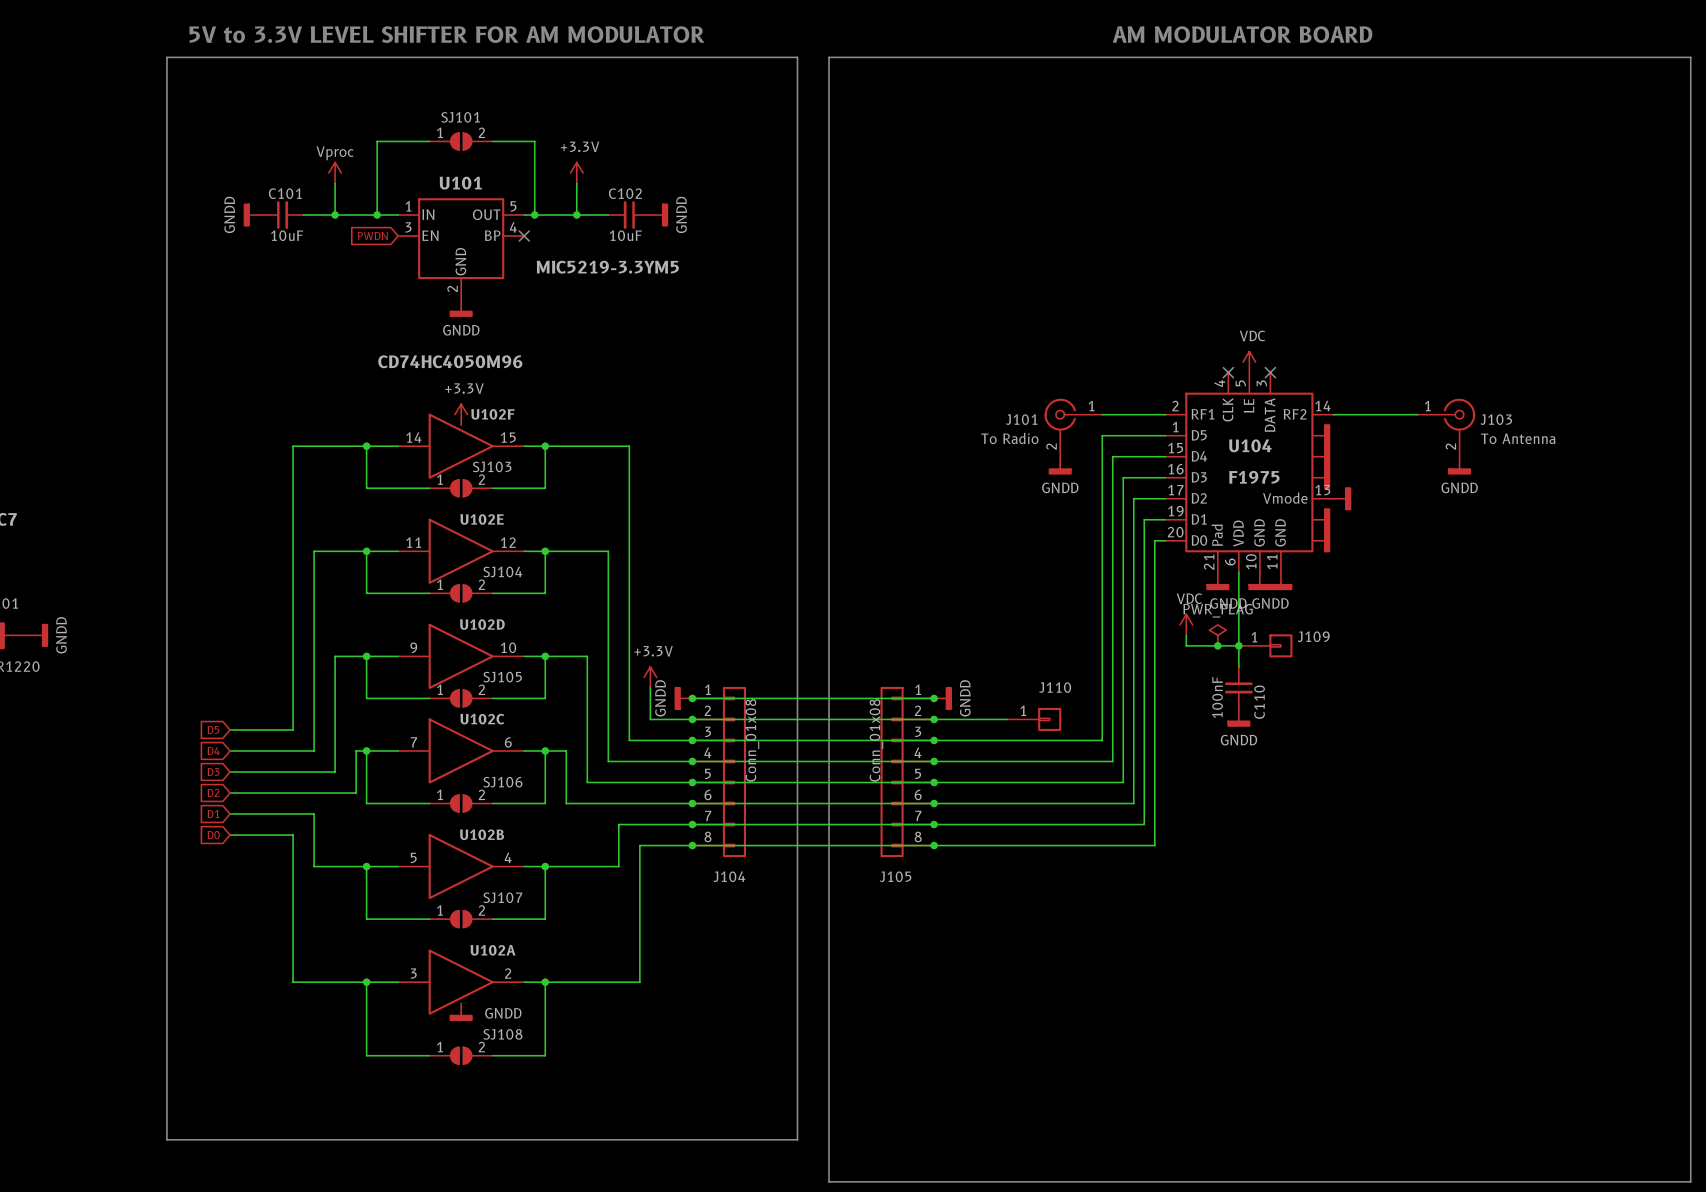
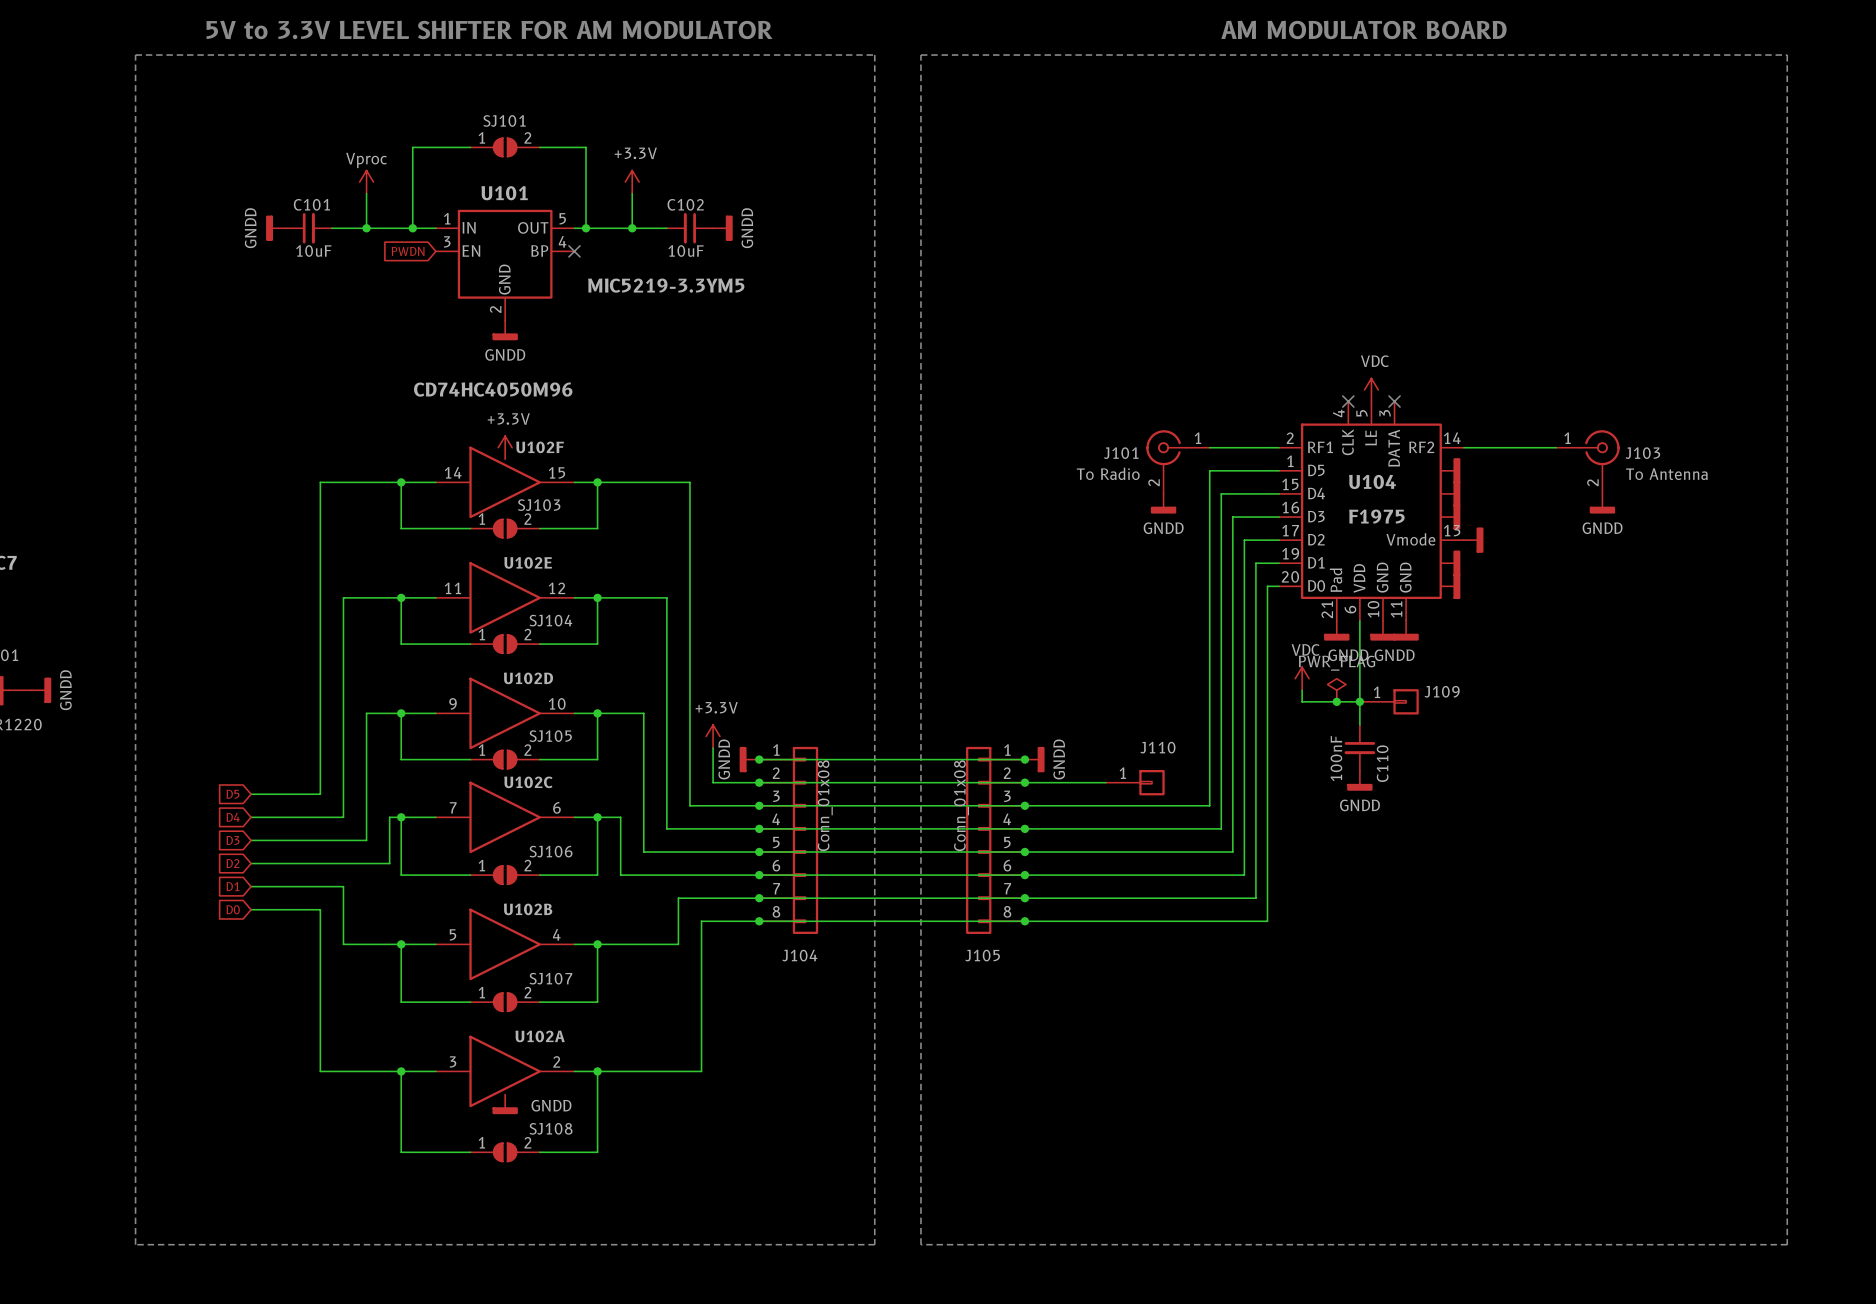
line: none -> (135, 55) (874, 55) (874, 1244) (135, 1244) (135, 55)
bus: (166, 57) (797, 57) (797, 1139) (166, 1139) (166, 57) -> none
bus: (829, 57) (1690, 57) (1690, 1181) (829, 1181) (829, 57) -> none
line: none -> (920, 55) (1787, 55) (1787, 1244) (920, 1244) (920, 55)

